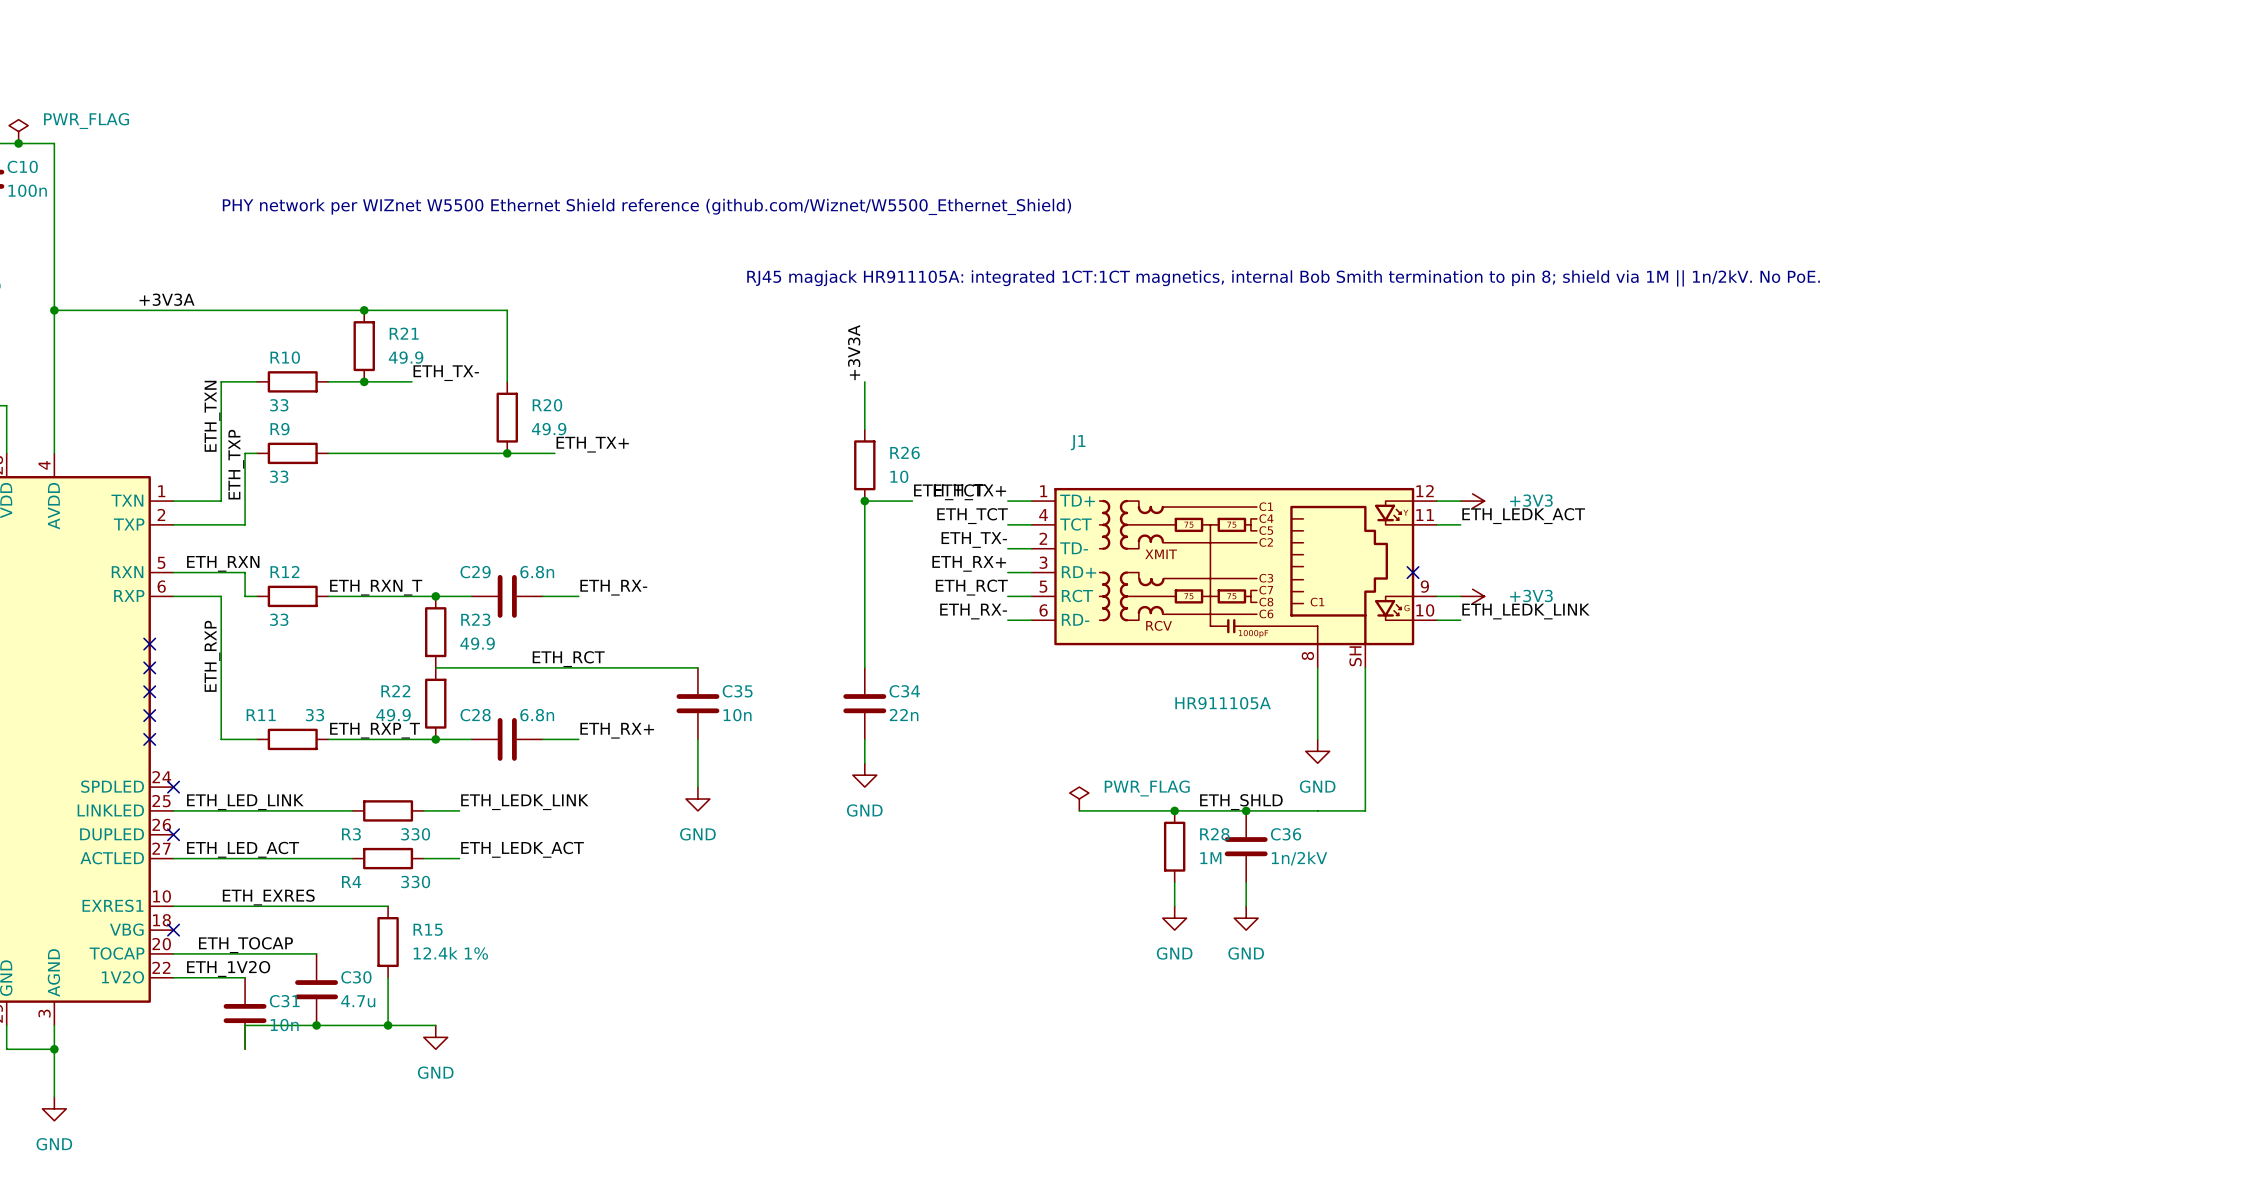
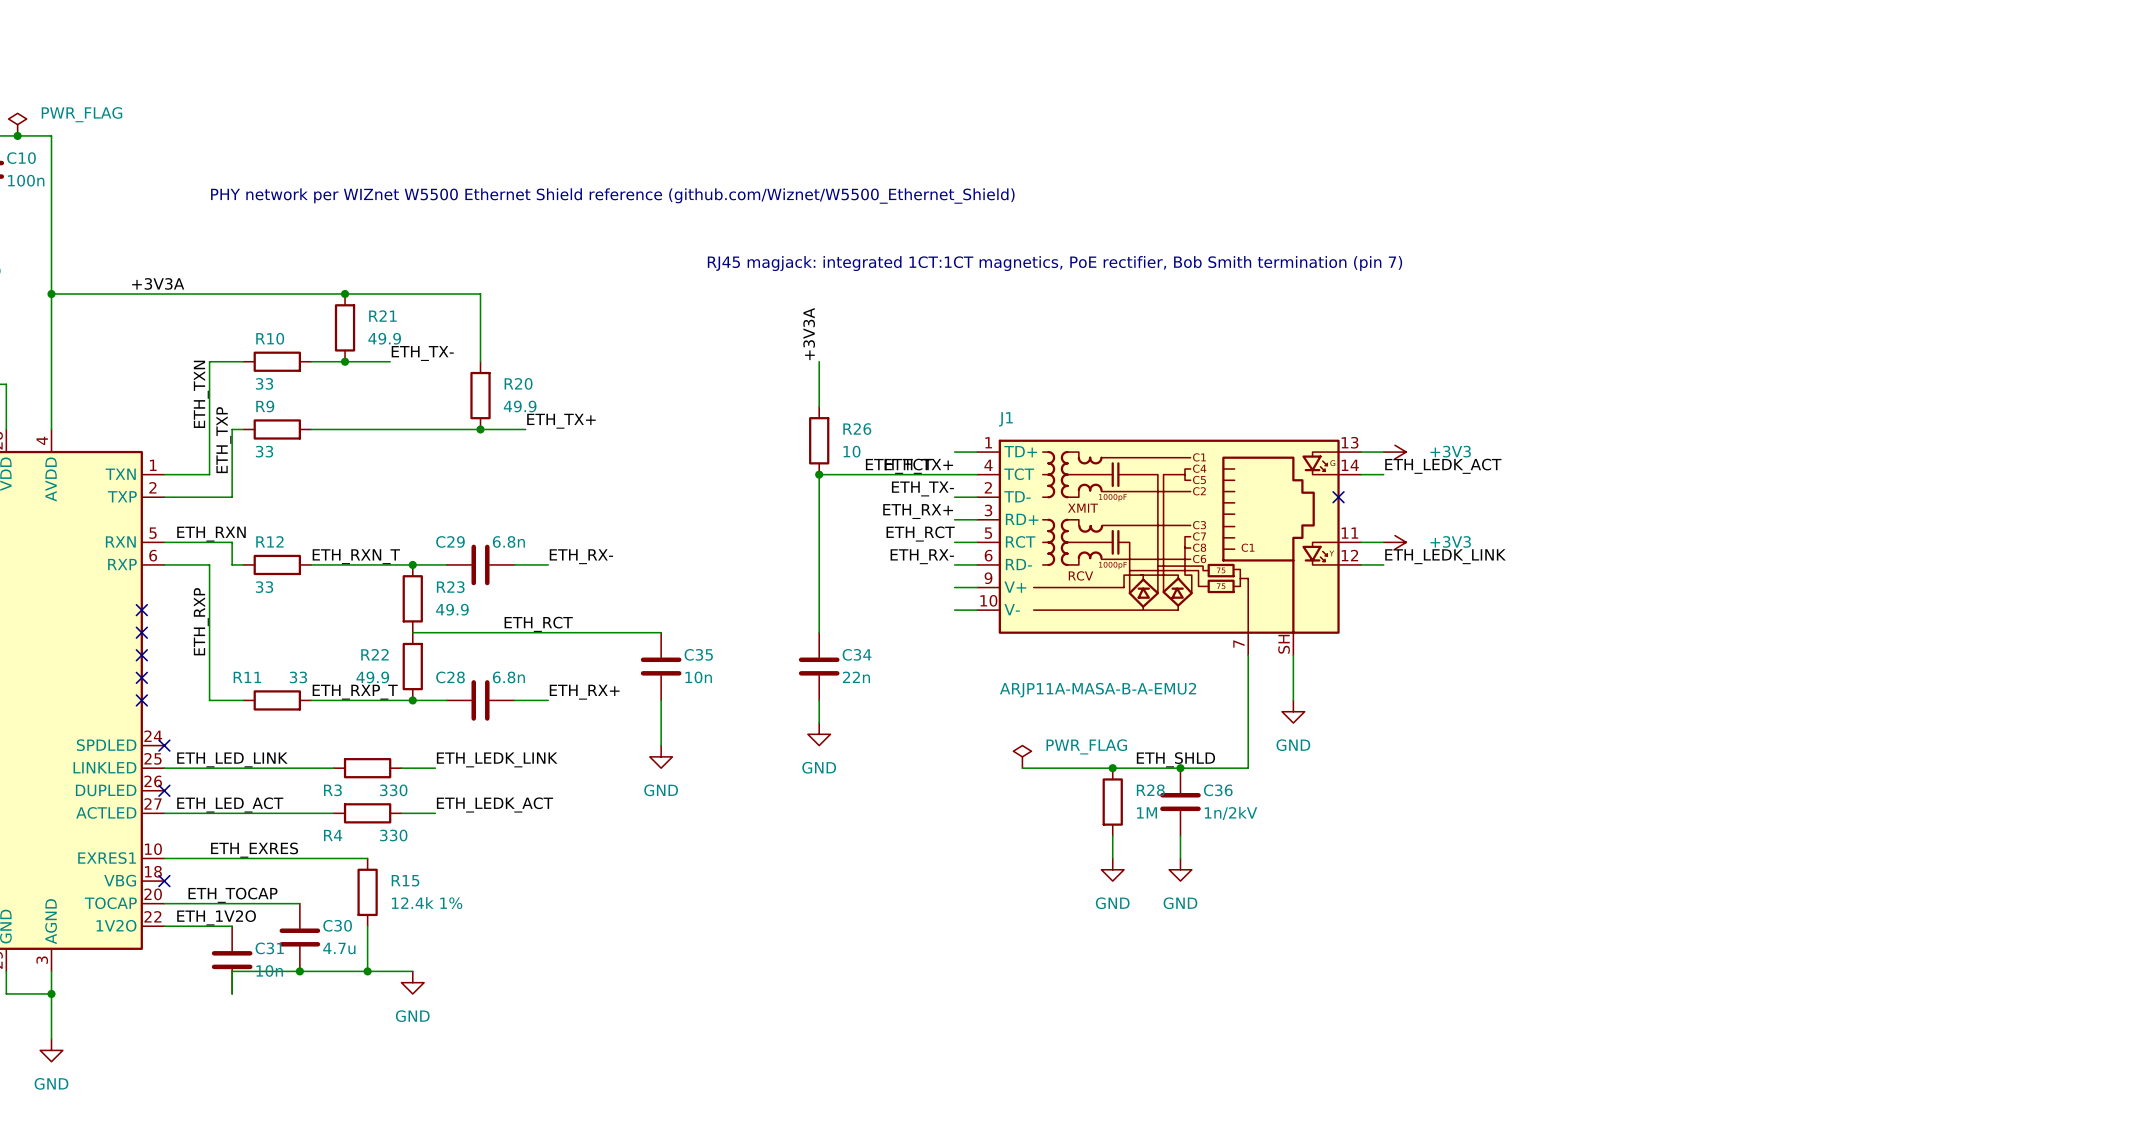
text: RJ45 magjack HR911105A: integrated 1CT:1CT magnetics, internal Bob Smith termination to pin 8; shield via 1M || 1n/2kV. No PoE. (1283, 278) -> RJ45 magjack: integrated 1CT:1CT magnetics, PoE rectifier, Bob Smith termination (pin 7) (1054, 263)
wire: none -> (954, 452) (977, 452)
J1 symbol: [1031, 487, 1437, 668] -> [977, 439, 1362, 656]
wire: none -> (864, 474) (954, 474)
power symbol position: +3V3 (1472, 501) -> +3V3 (1394, 452)
label: ETH_TCT (972, 516) -> ETH_TX- (922, 488)
label position: ETH_LEDK_ACT (1523, 516) -> ETH_LEDK_ACT (1443, 466)
wire: (1436, 524) (1460, 524) -> (1361, 452) (1383, 452)
label: ETH_TX- (974, 540) -> ETH_RX+ (918, 511)
label: ETH_RX+ (969, 563) -> ETH_RCT (920, 534)
no-connect mark position: (1413, 572) -> (1338, 497)
label: ETH_RCT (971, 587) -> ETH_RX- (922, 556)
power symbol position: +3V3 (1472, 596) -> +3V3 (1394, 542)
label: ETH_RX- (973, 611) -> none
label position: ETH_LEDK_LINK (1525, 611) -> ETH_LEDK_LINK (1445, 556)
wire: (1436, 620) (1460, 620) -> (1361, 542) (1383, 542)
wire: none -> (954, 610) (977, 610)
J1 value: HR911105A (1223, 703) -> ARJP11A-MASA-B-A-EMU2 (1098, 690)
wire: (1365, 739) (1365, 810) (1317, 810) -> (1248, 700) (1248, 768)
power symbol position: GND (1317, 751) -> GND (1293, 711)

